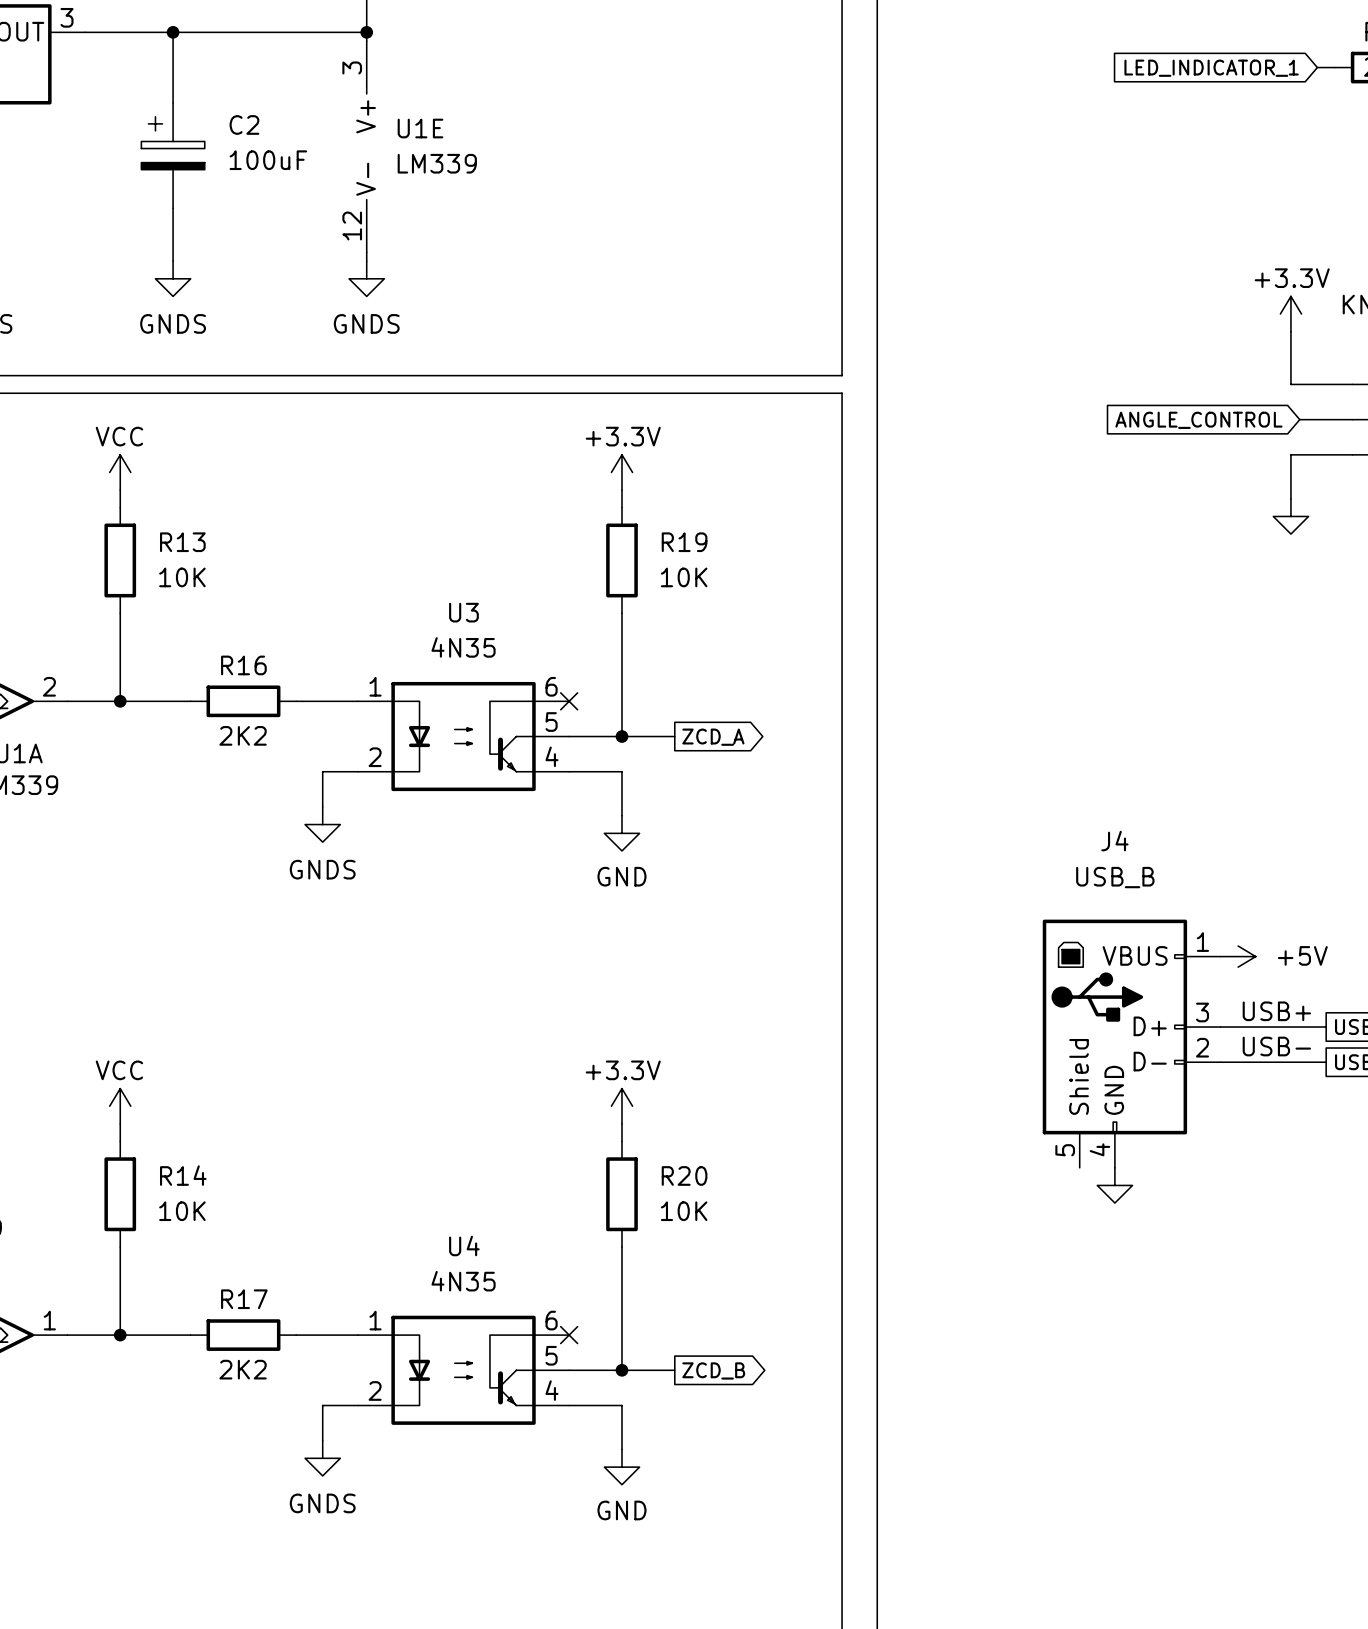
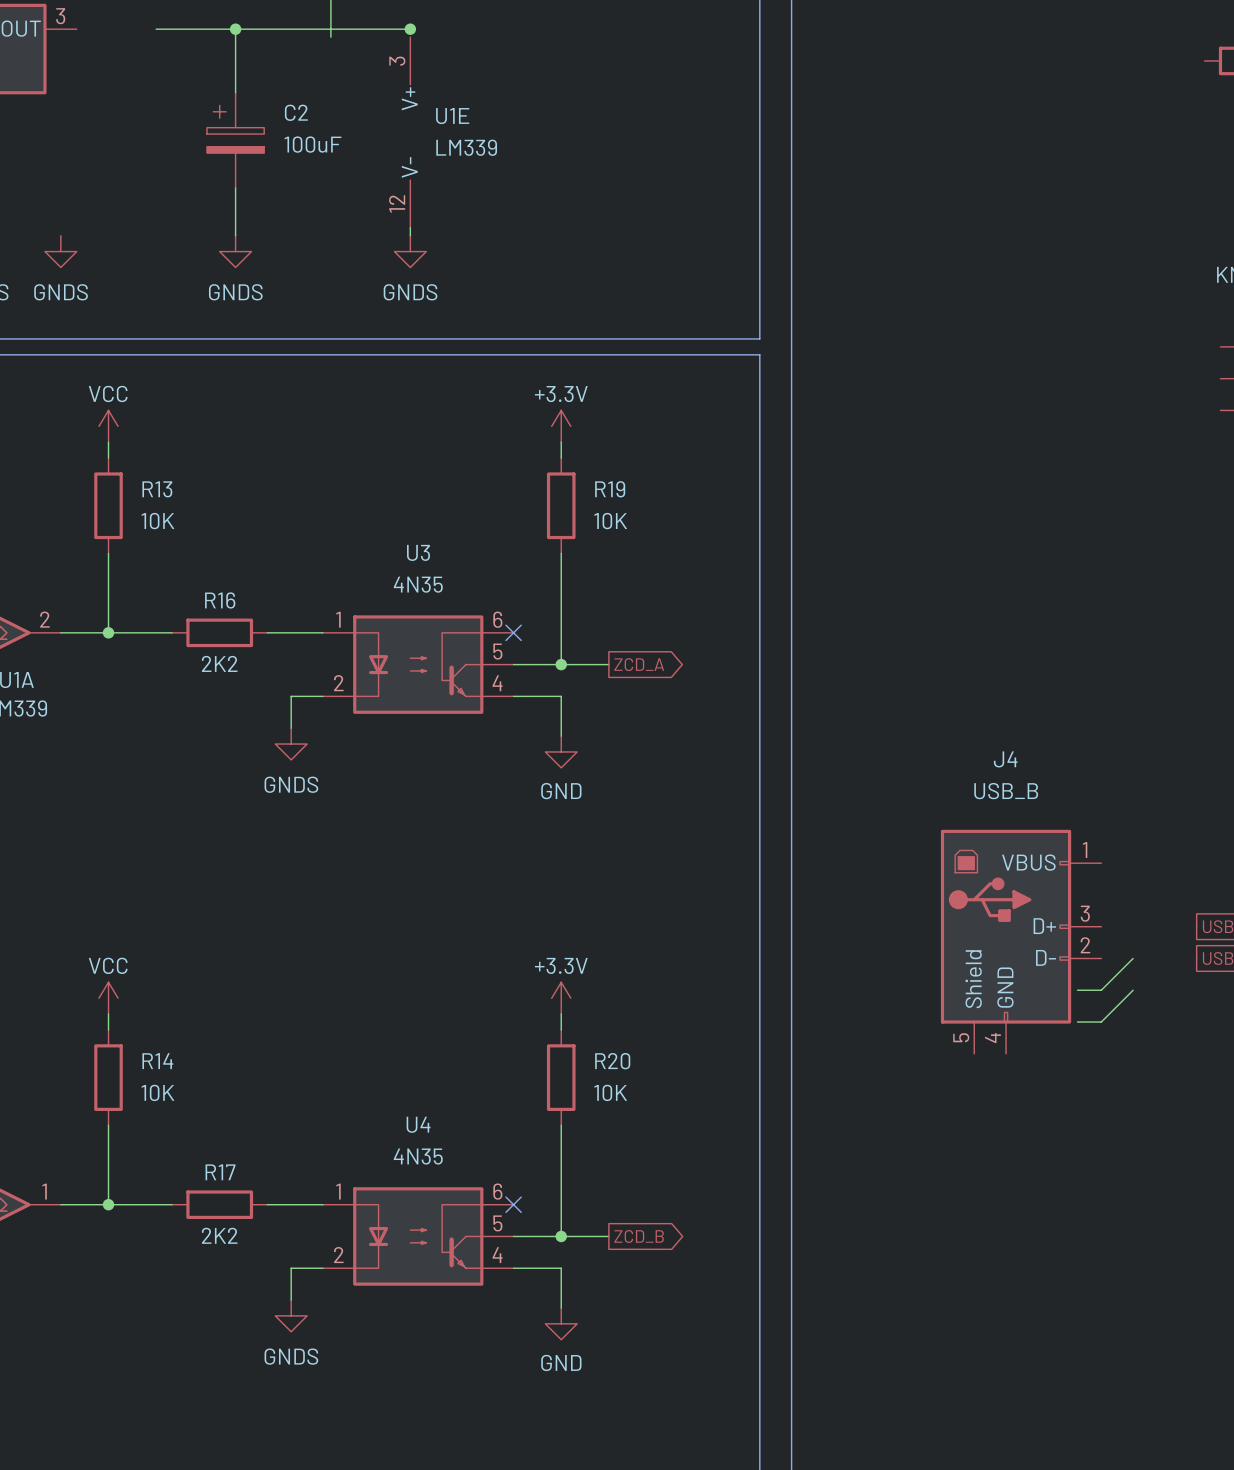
wire: (85, 32) (173, 32) (173, 102) -> none
junction: (173, 32) -> none
wire: none -> (235, 29) (235, 92)
junction: none -> (235, 29)
wire: none -> (330, 29) (410, 29)
junction: (366, 32) -> none
junction: none -> (410, 29)
wire: (1317, 67) (1334, 67) -> none
global label: LED_INDICATOR_1 (1211, 68) -> none
U1E position: (366, 146) -> (410, 132)
C2 position: (173, 155) -> (235, 140)
wire: (173, 208) (173, 261) -> (235, 188) (235, 235)
wire: (366, 252) (366, 261) -> (410, 227) (410, 235)
power symbol: none -> GNDS (60, 251)
power symbol: GNDS (173, 278) -> none
power symbol: none -> GNDS (235, 251)
power symbol: GNDS (366, 278) -> none
power symbol: none -> GNDS (410, 251)
power symbol: +3.3V (1290, 314) -> none
wire: (1290, 331) (1290, 384) (1352, 384) -> none
wire: (1299, 419) (1352, 419) -> none
global label: ANGLE_CONTROL (1198, 420) -> none
wire: (1352, 454) (1290, 454) (1290, 498) -> none
power symbol: (1290, 516) -> none
power symbol: +5V (1238, 956) -> none
label: USB+ (1276, 1011) -> none
wire: (1220, 1027) (1326, 1027) -> none
label: USB- (1276, 1046) -> none
wire: (1220, 1062) (1326, 1062) -> none
wire: none -> (1133, 958) (1101, 990) (1077, 990)
wire: none -> (1133, 990) (1101, 1022)
wire: none -> (1077, 1022) (1101, 1022)
power symbol: (1114, 1185) -> none

